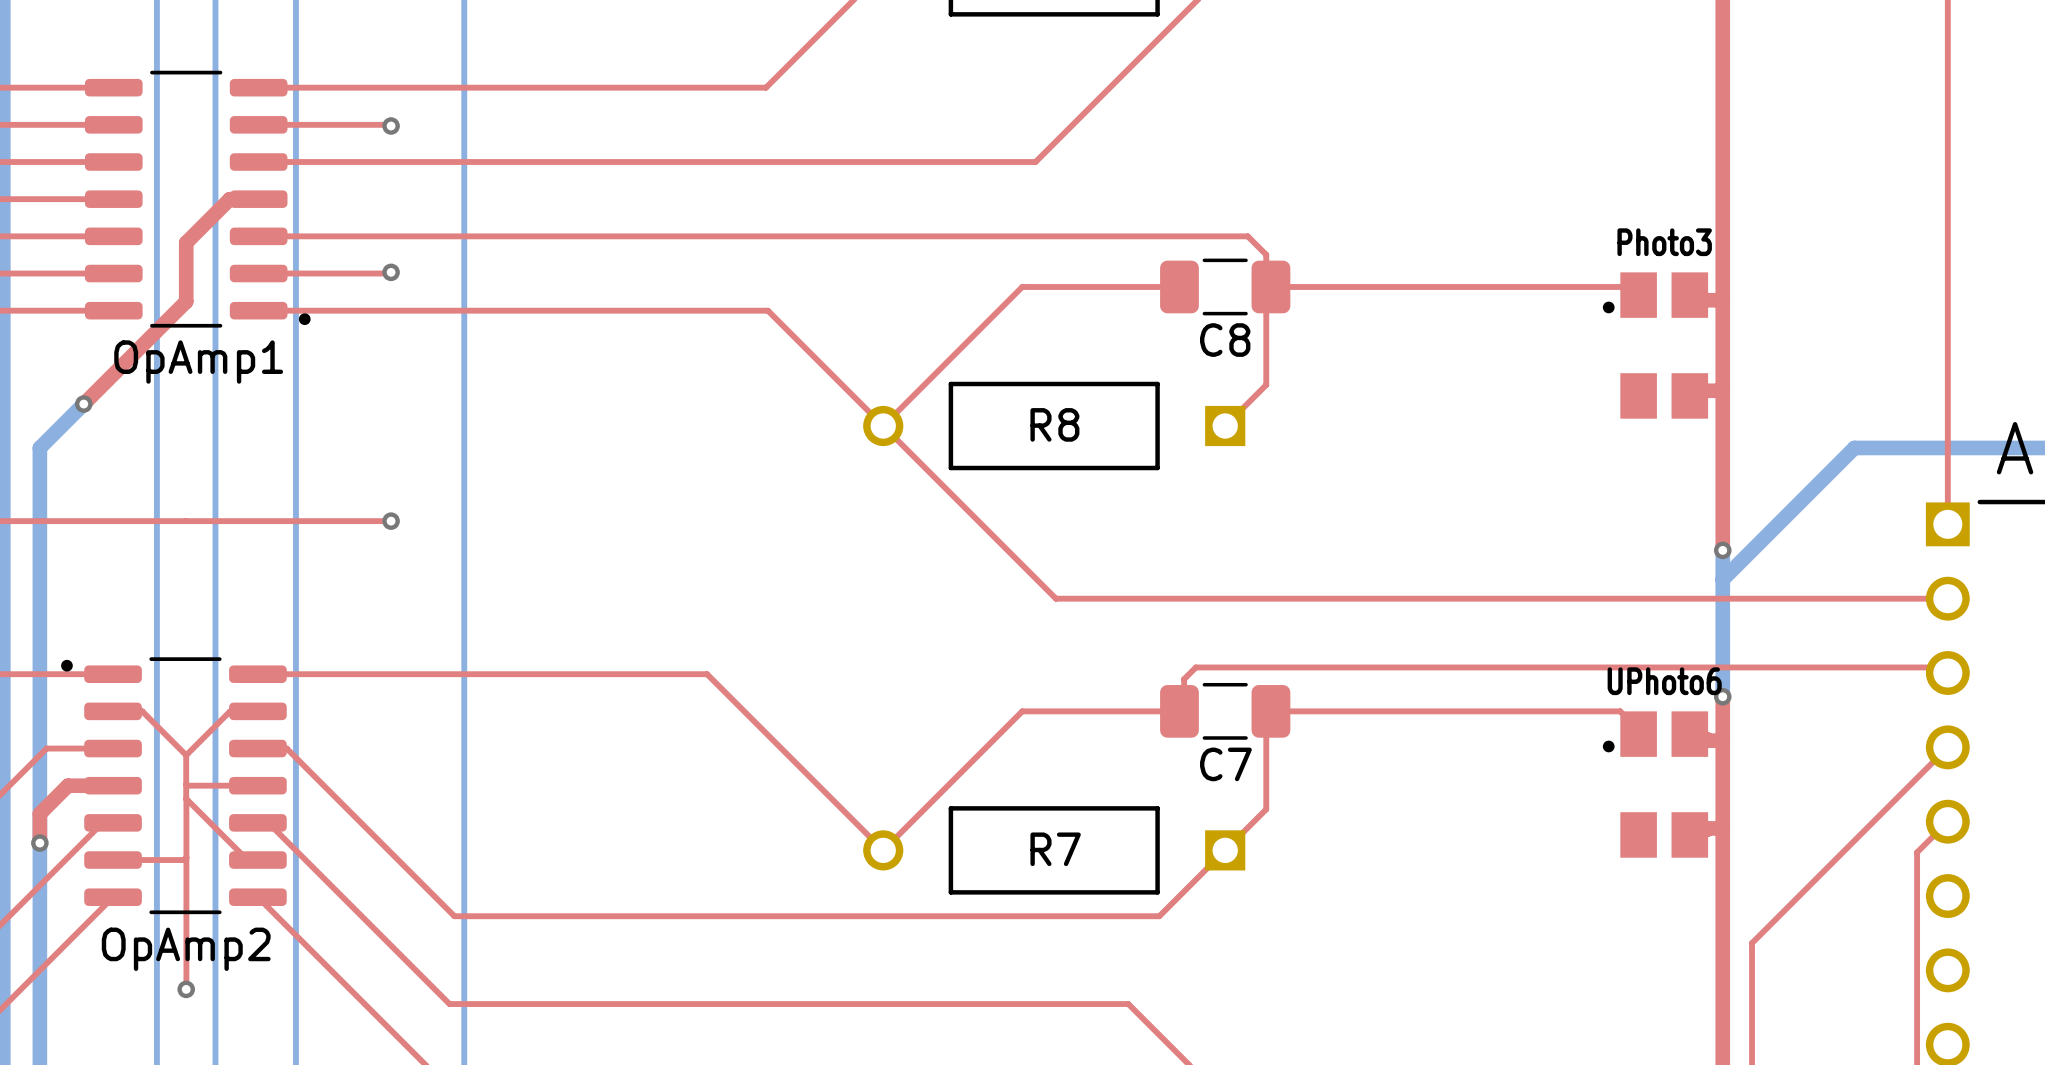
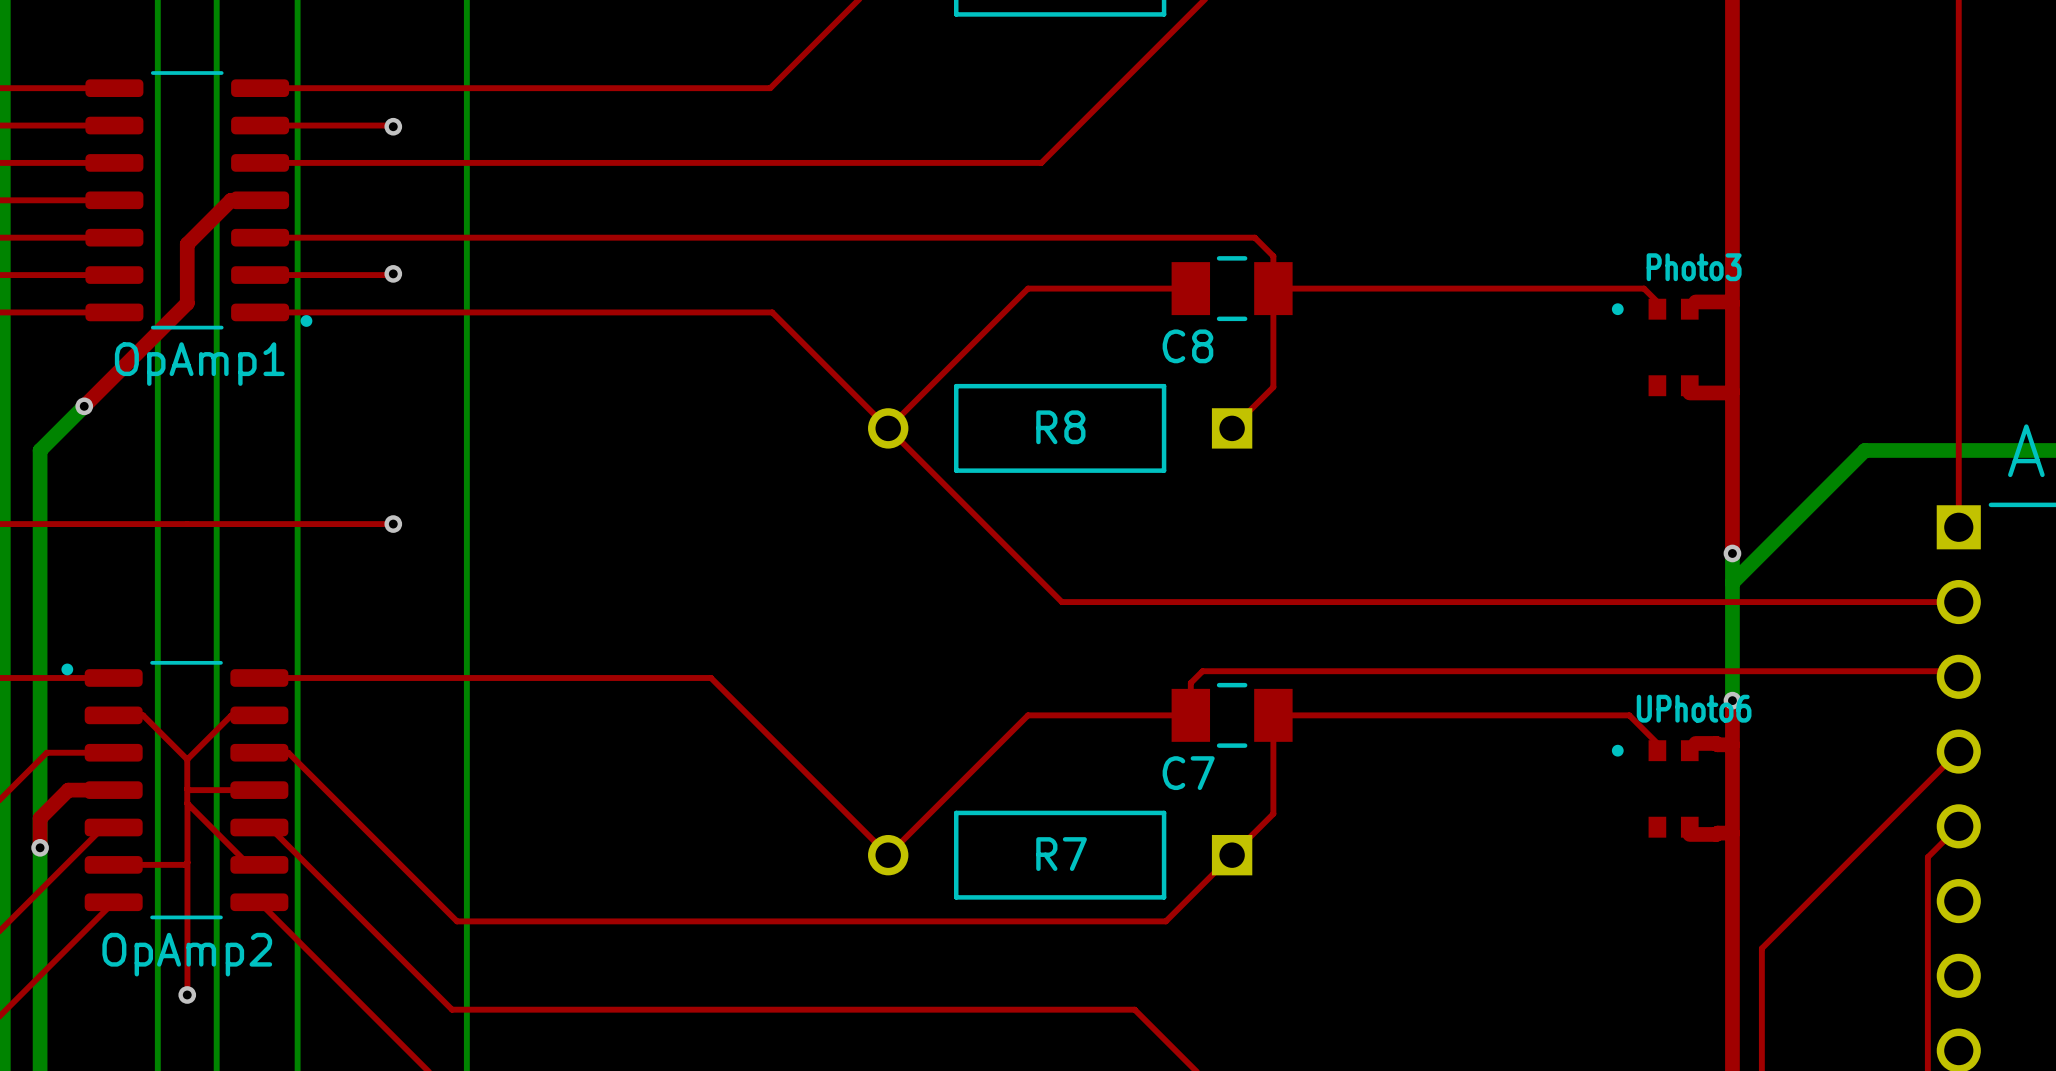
C8 footprint: [1160, 258, 1291, 316] -> [1171, 256, 1293, 322]
Photo3 footprint: [1602, 272, 1709, 419] -> [1611, 298, 1699, 397]
C8 name position: C8 (1225, 340) -> C8 (1187, 346)
C7 footprint: [1160, 682, 1291, 740] -> [1171, 682, 1293, 748]
UPhoto6 footprint: [1602, 711, 1709, 858] -> [1611, 740, 1699, 838]
C7 name position: C7 (1225, 764) -> C7 (1188, 773)

